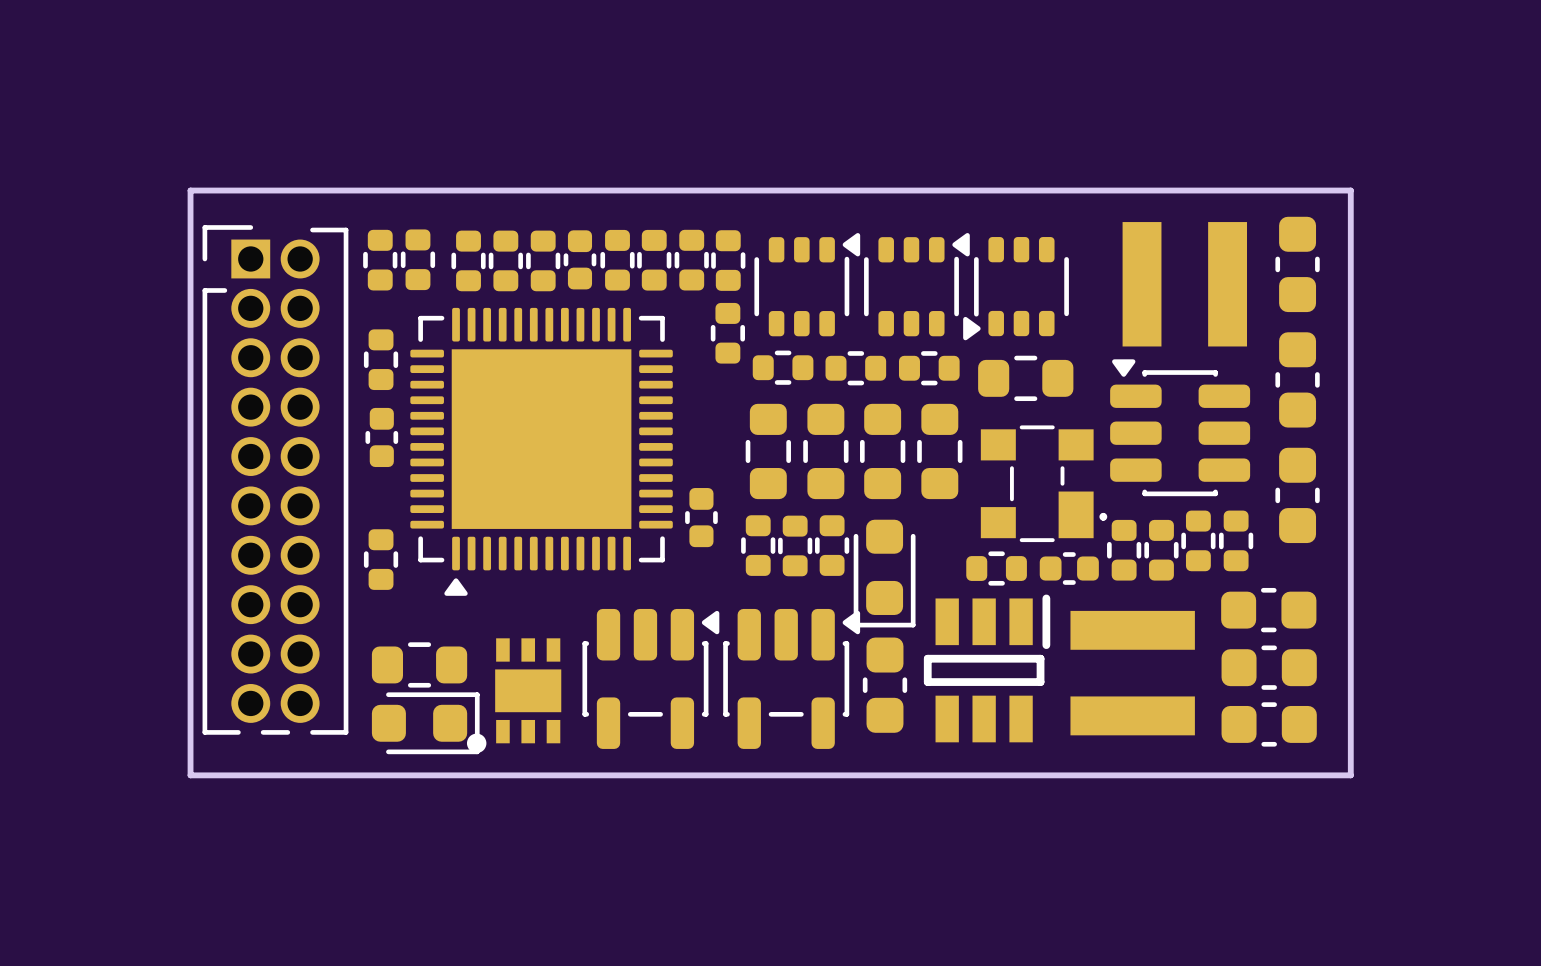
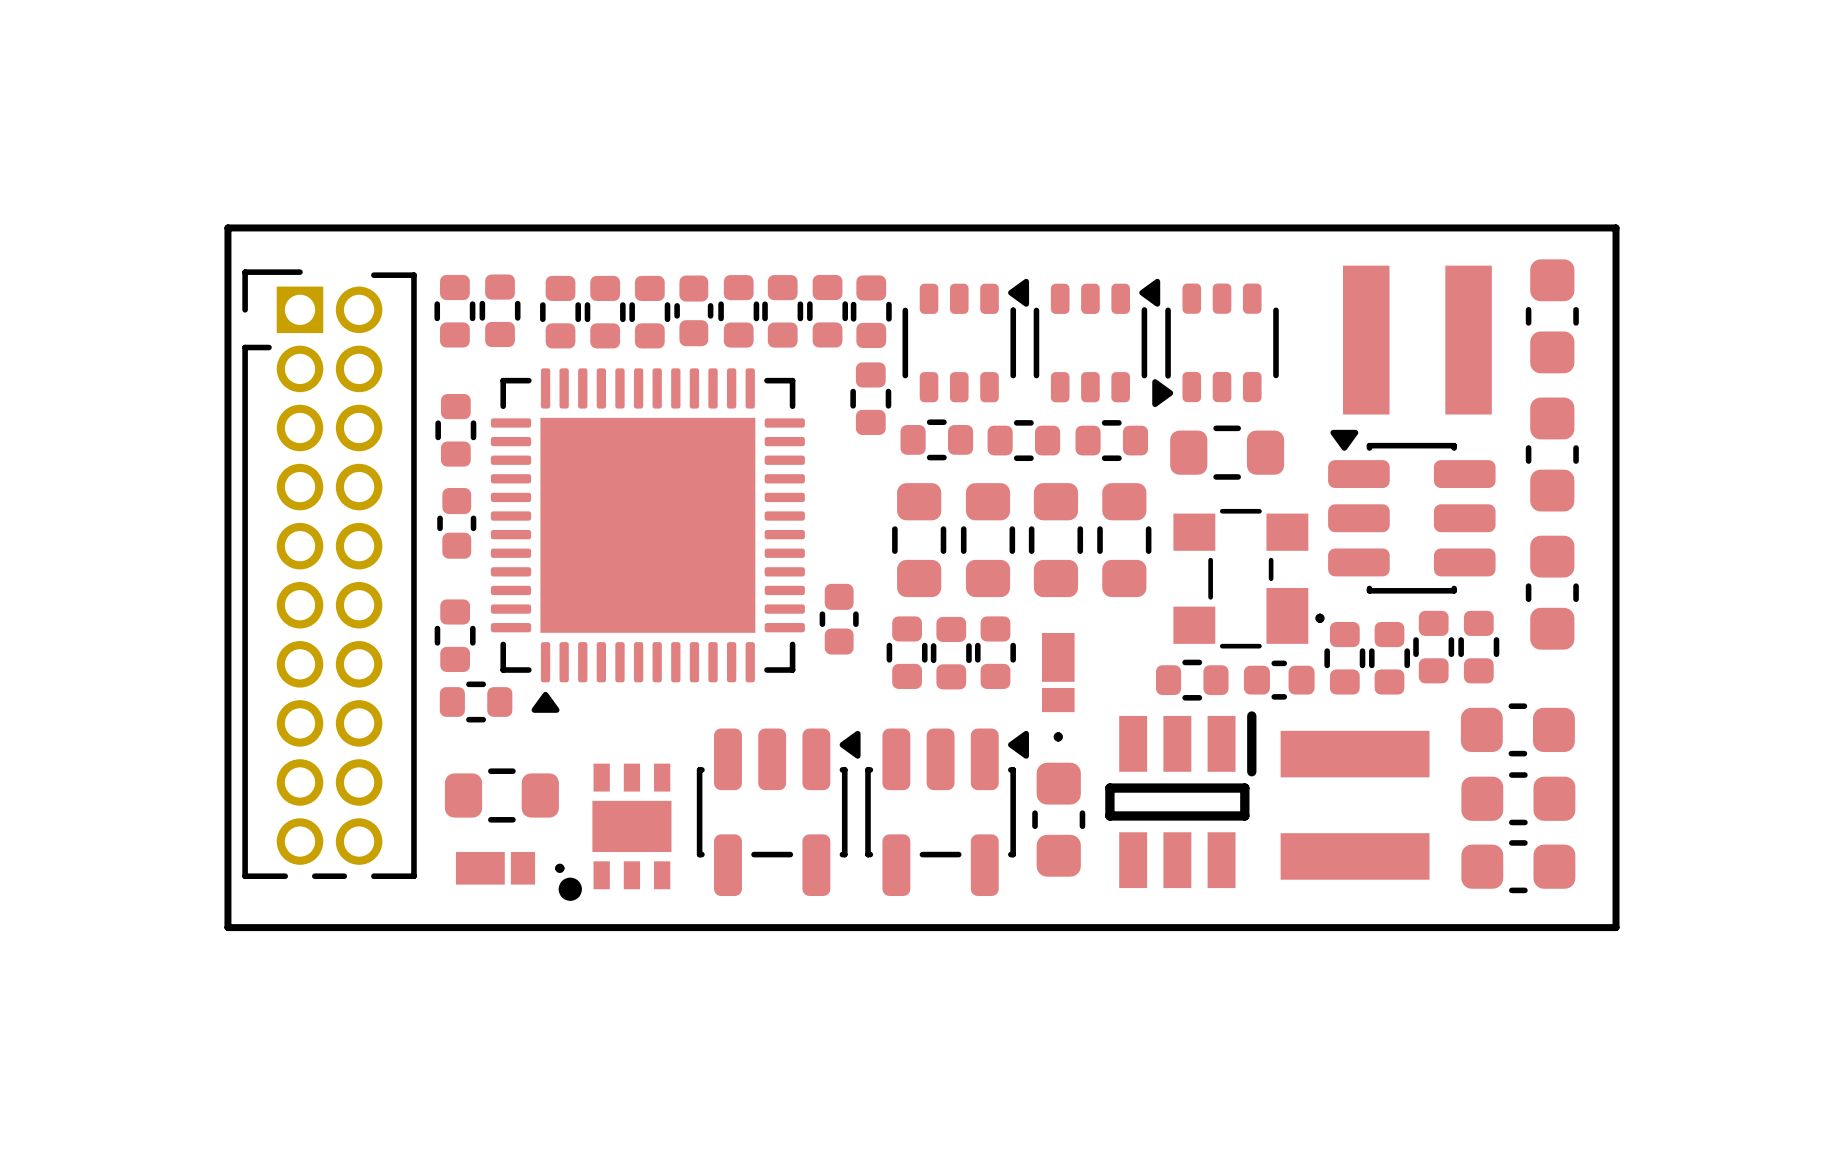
part footprint: [853, 519, 916, 628] -> [1041, 633, 1075, 742]
part: none -> (455, 635)
part: (381, 559) -> none
part: none -> (476, 701)
part footprint: [371, 692, 480, 755] -> [455, 852, 565, 885]

